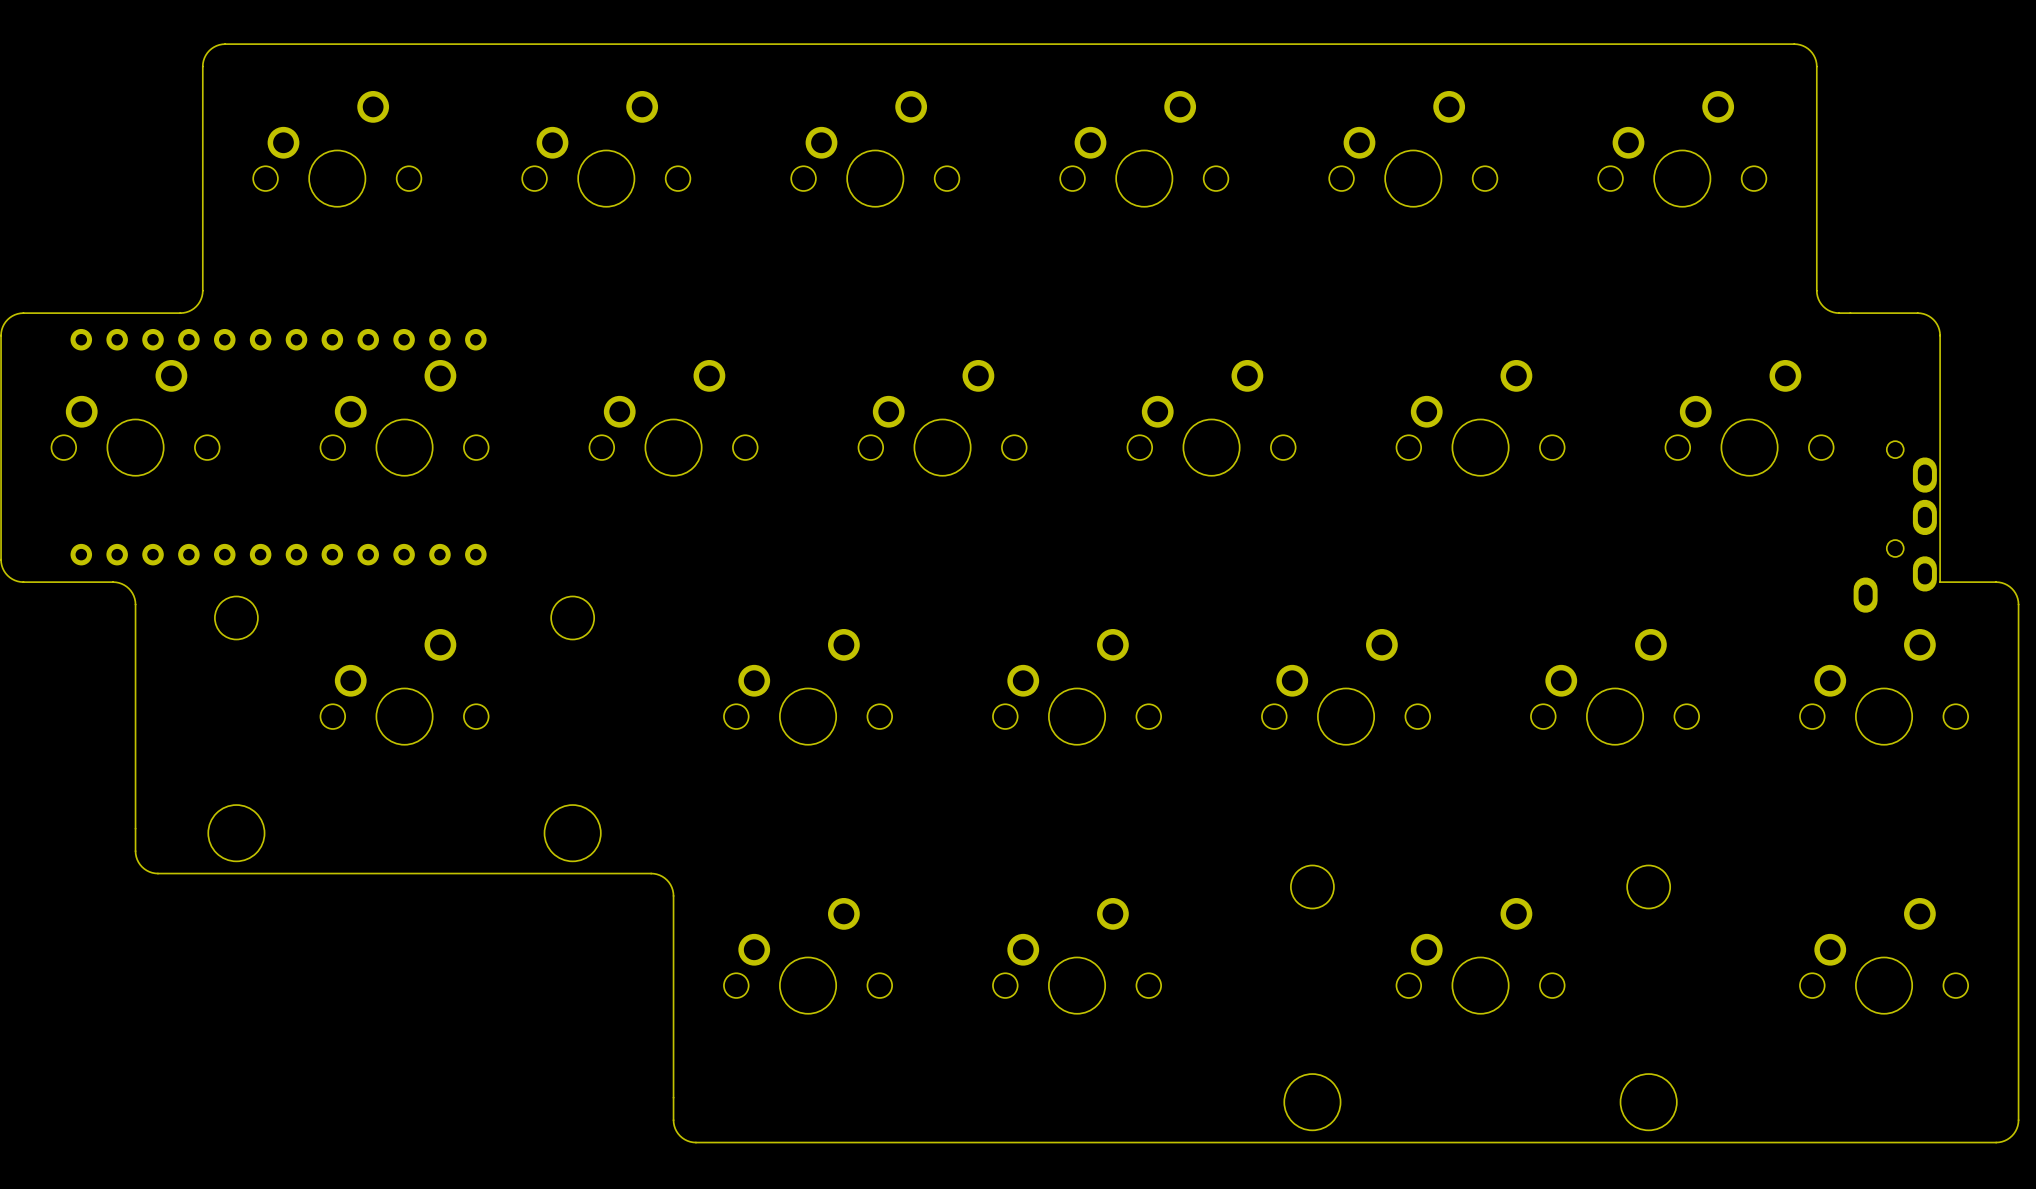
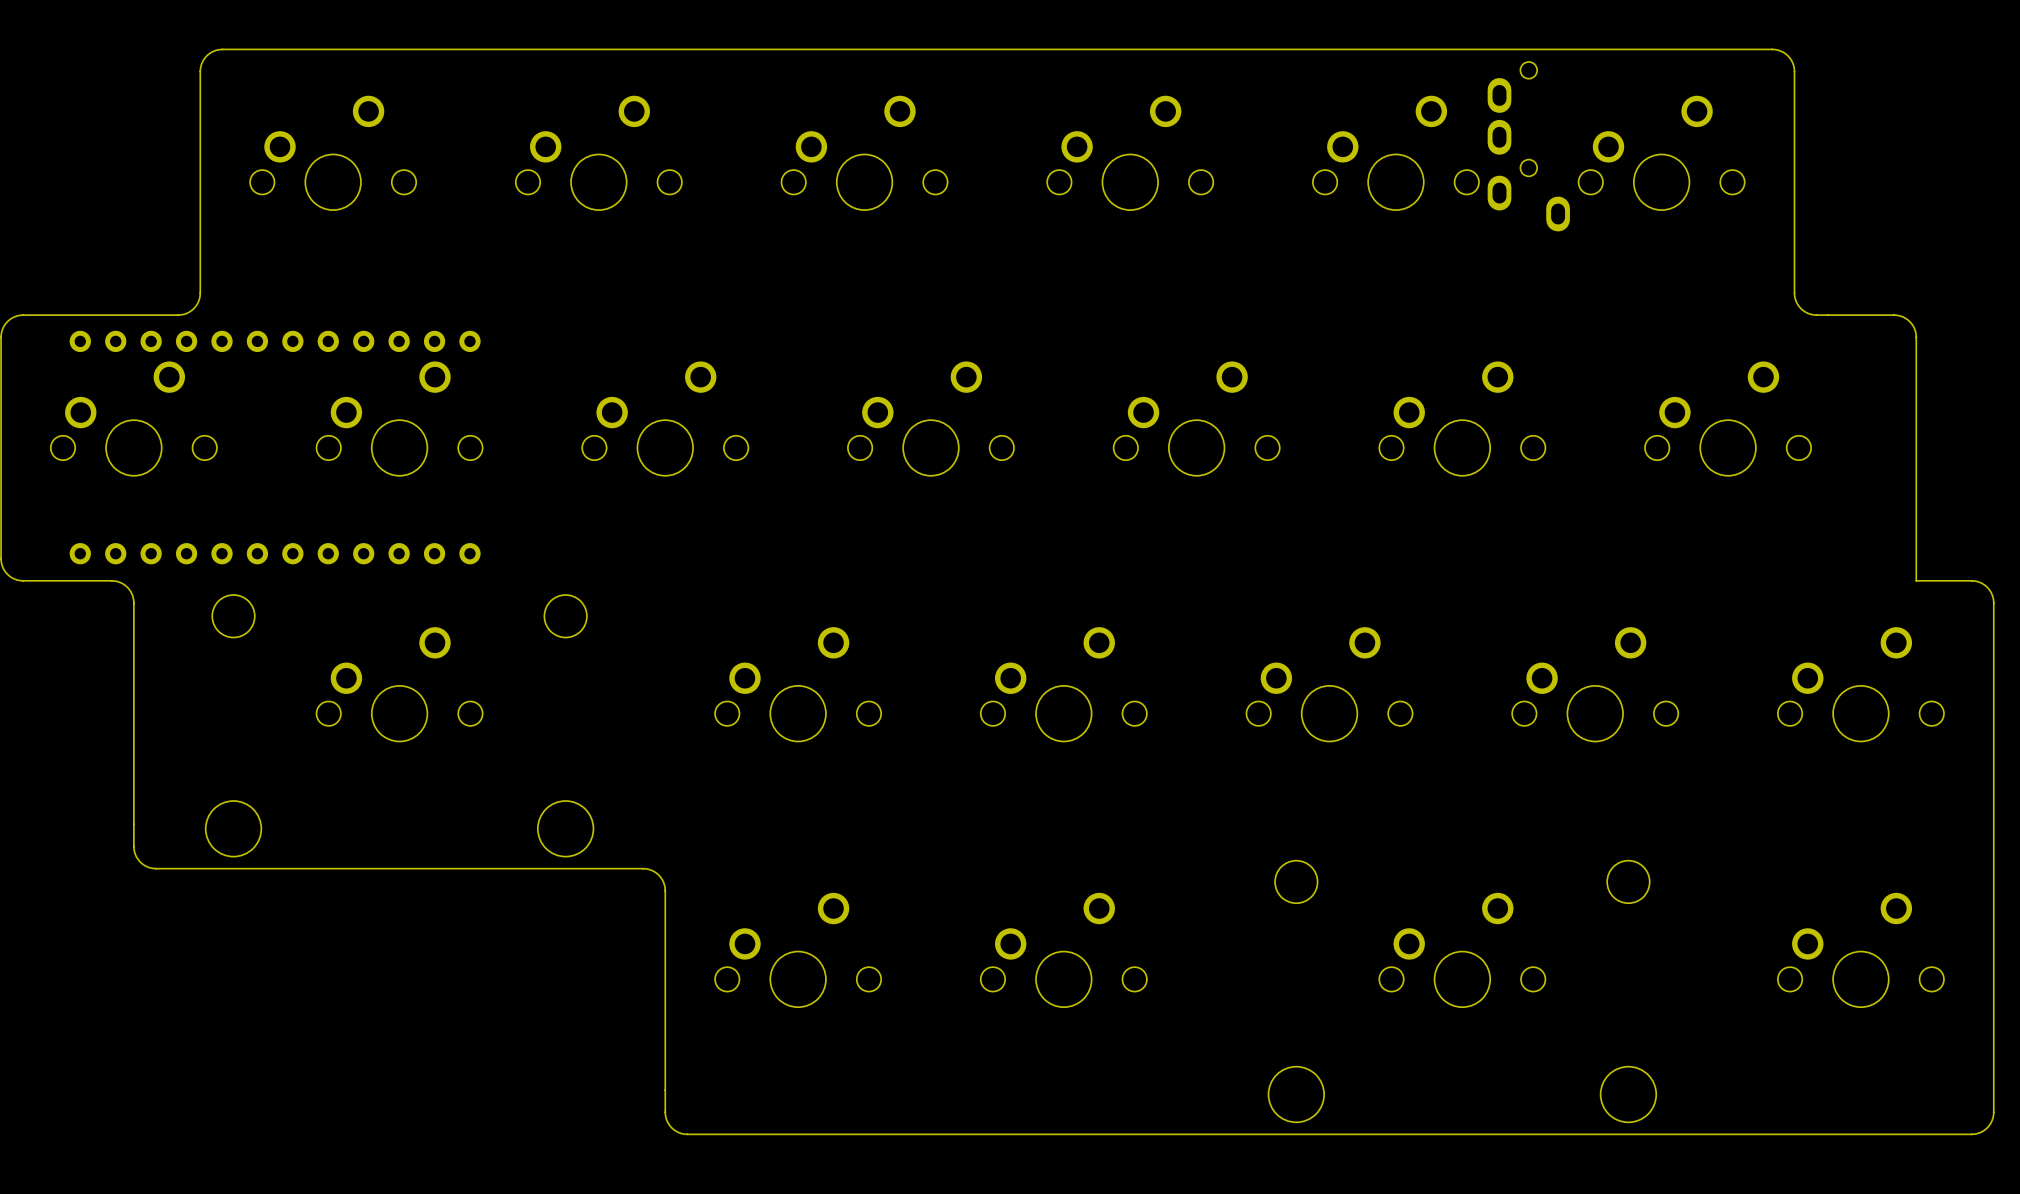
part: none -> (1528, 146)
part: (1895, 526) -> none

